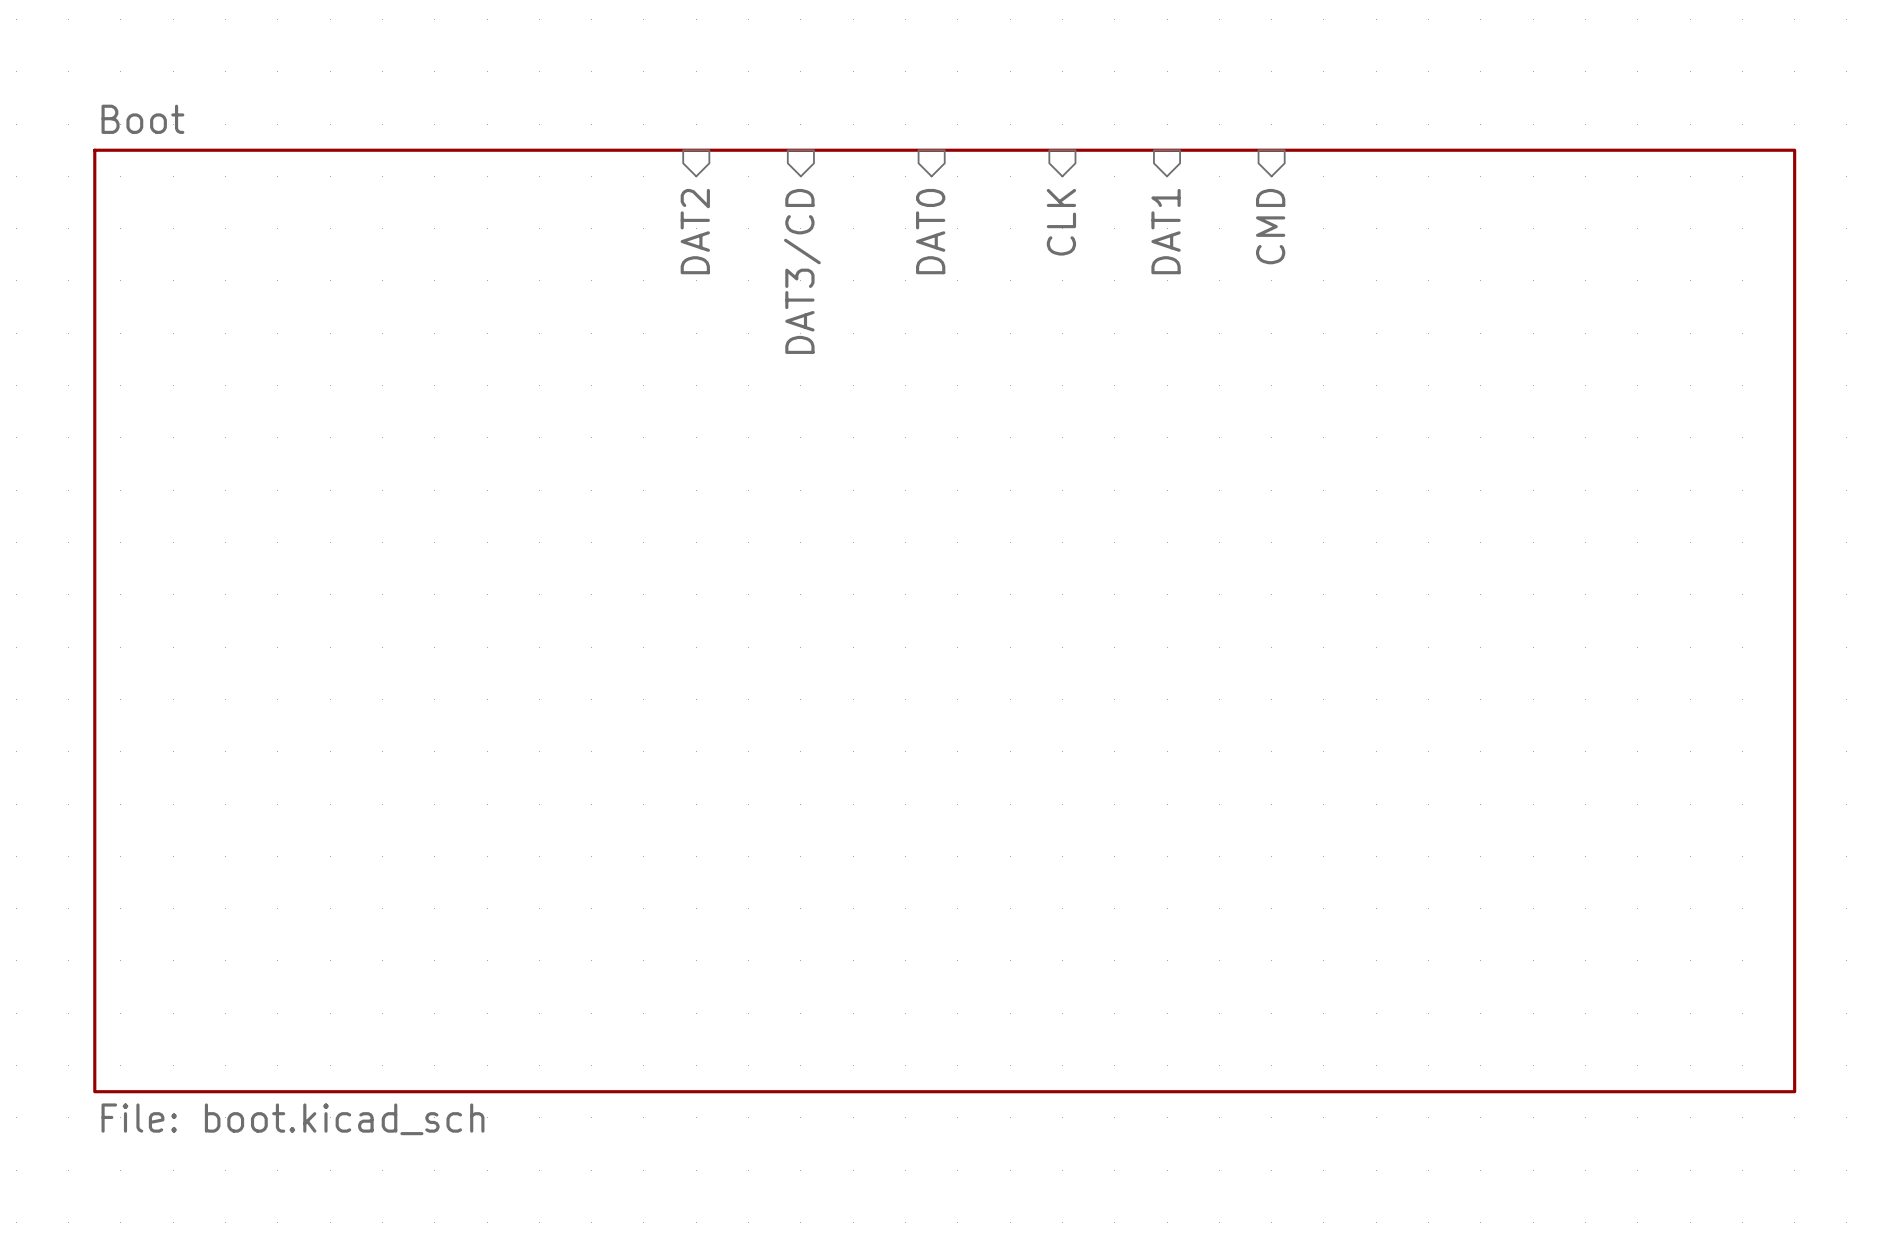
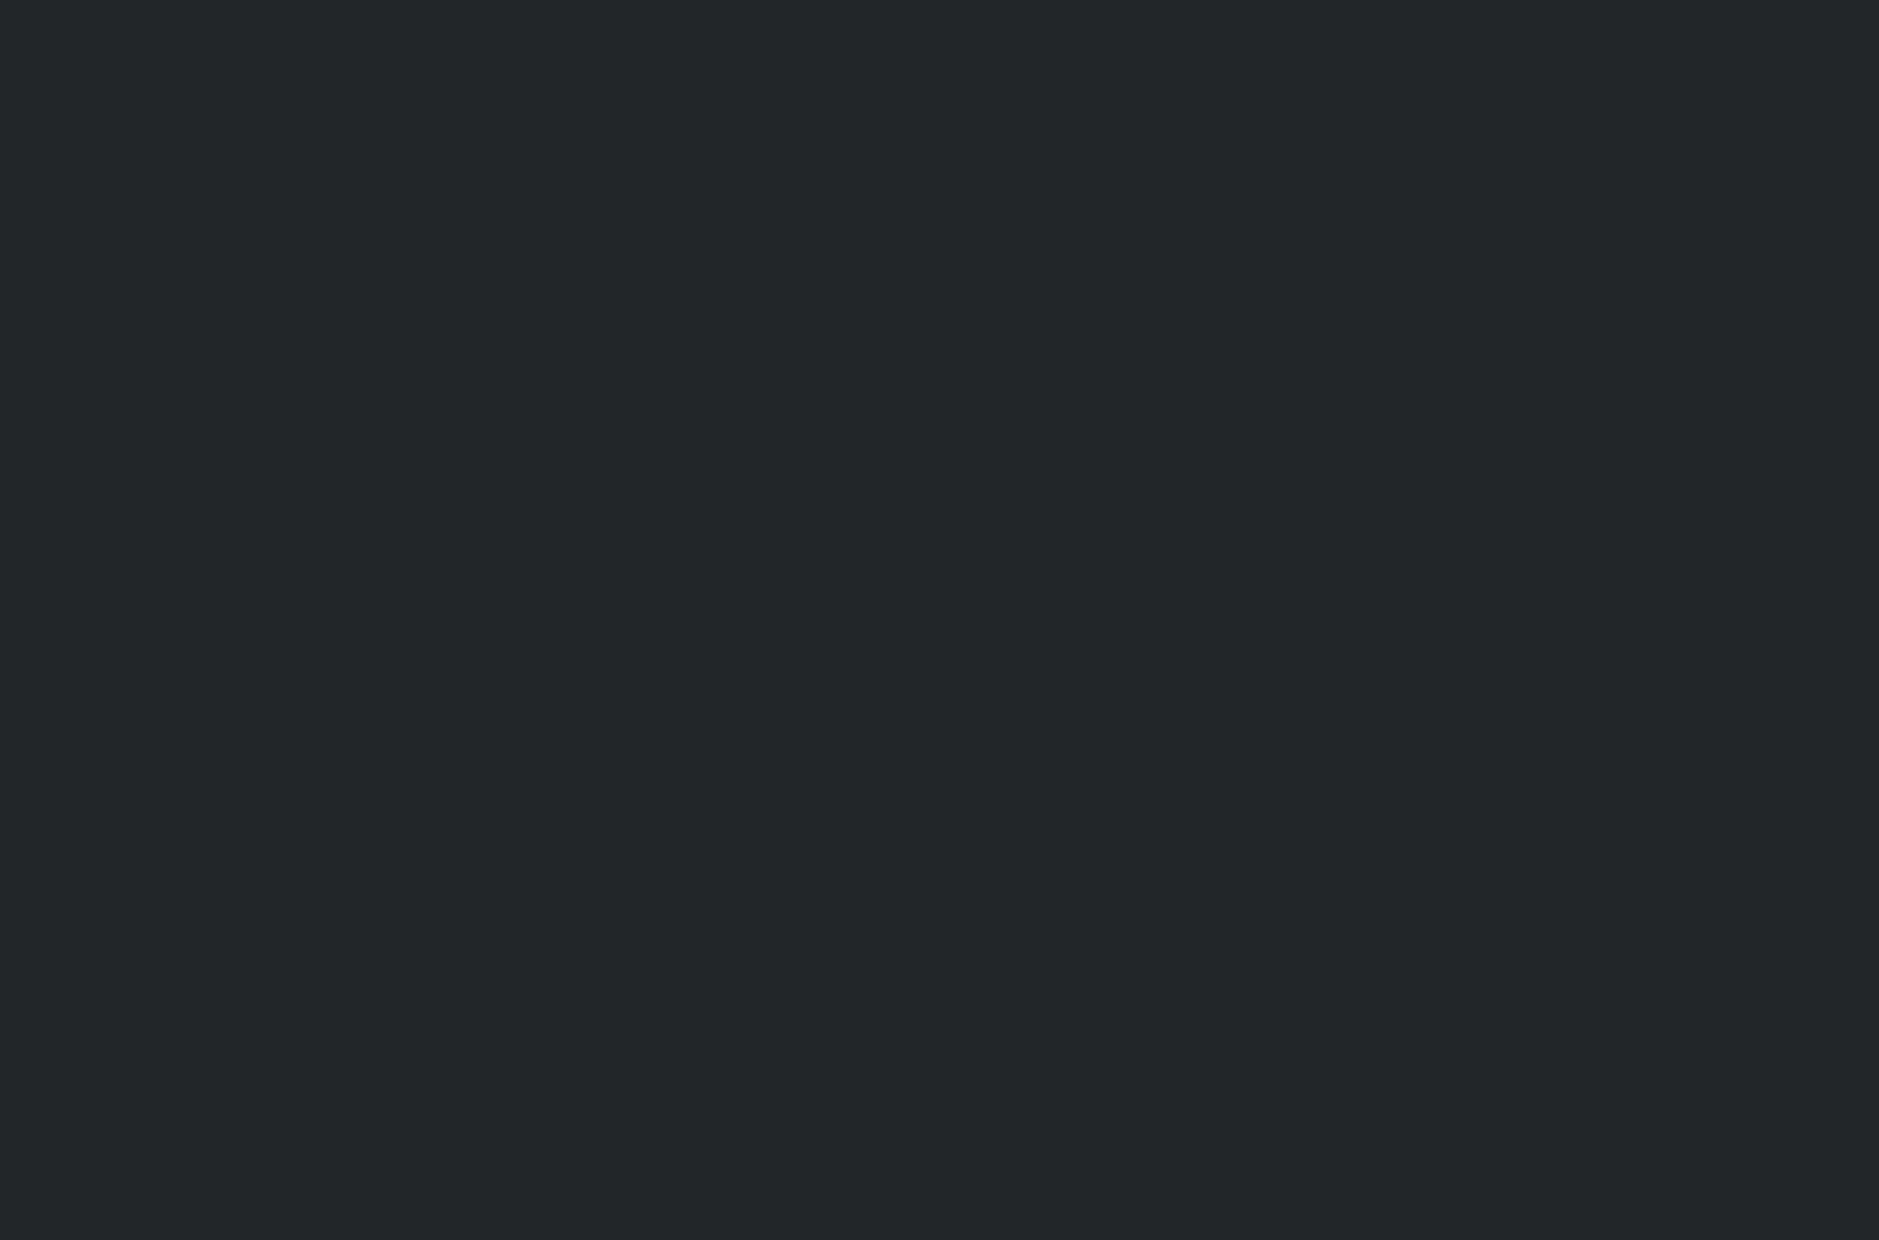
sheet pin: CLK (1061, 222) -> none
sheet pin: CMD (1270, 226) -> none
sheet pin: DAT2 (695, 231) -> none
sheet pin: DAT0 (930, 231) -> none
sheet pin: DAT1 (1166, 231) -> none
sheet pin: DAT3/CD (802, 271) -> none
sheet Boot: File: boot.kicad_sch (944, 620) -> none

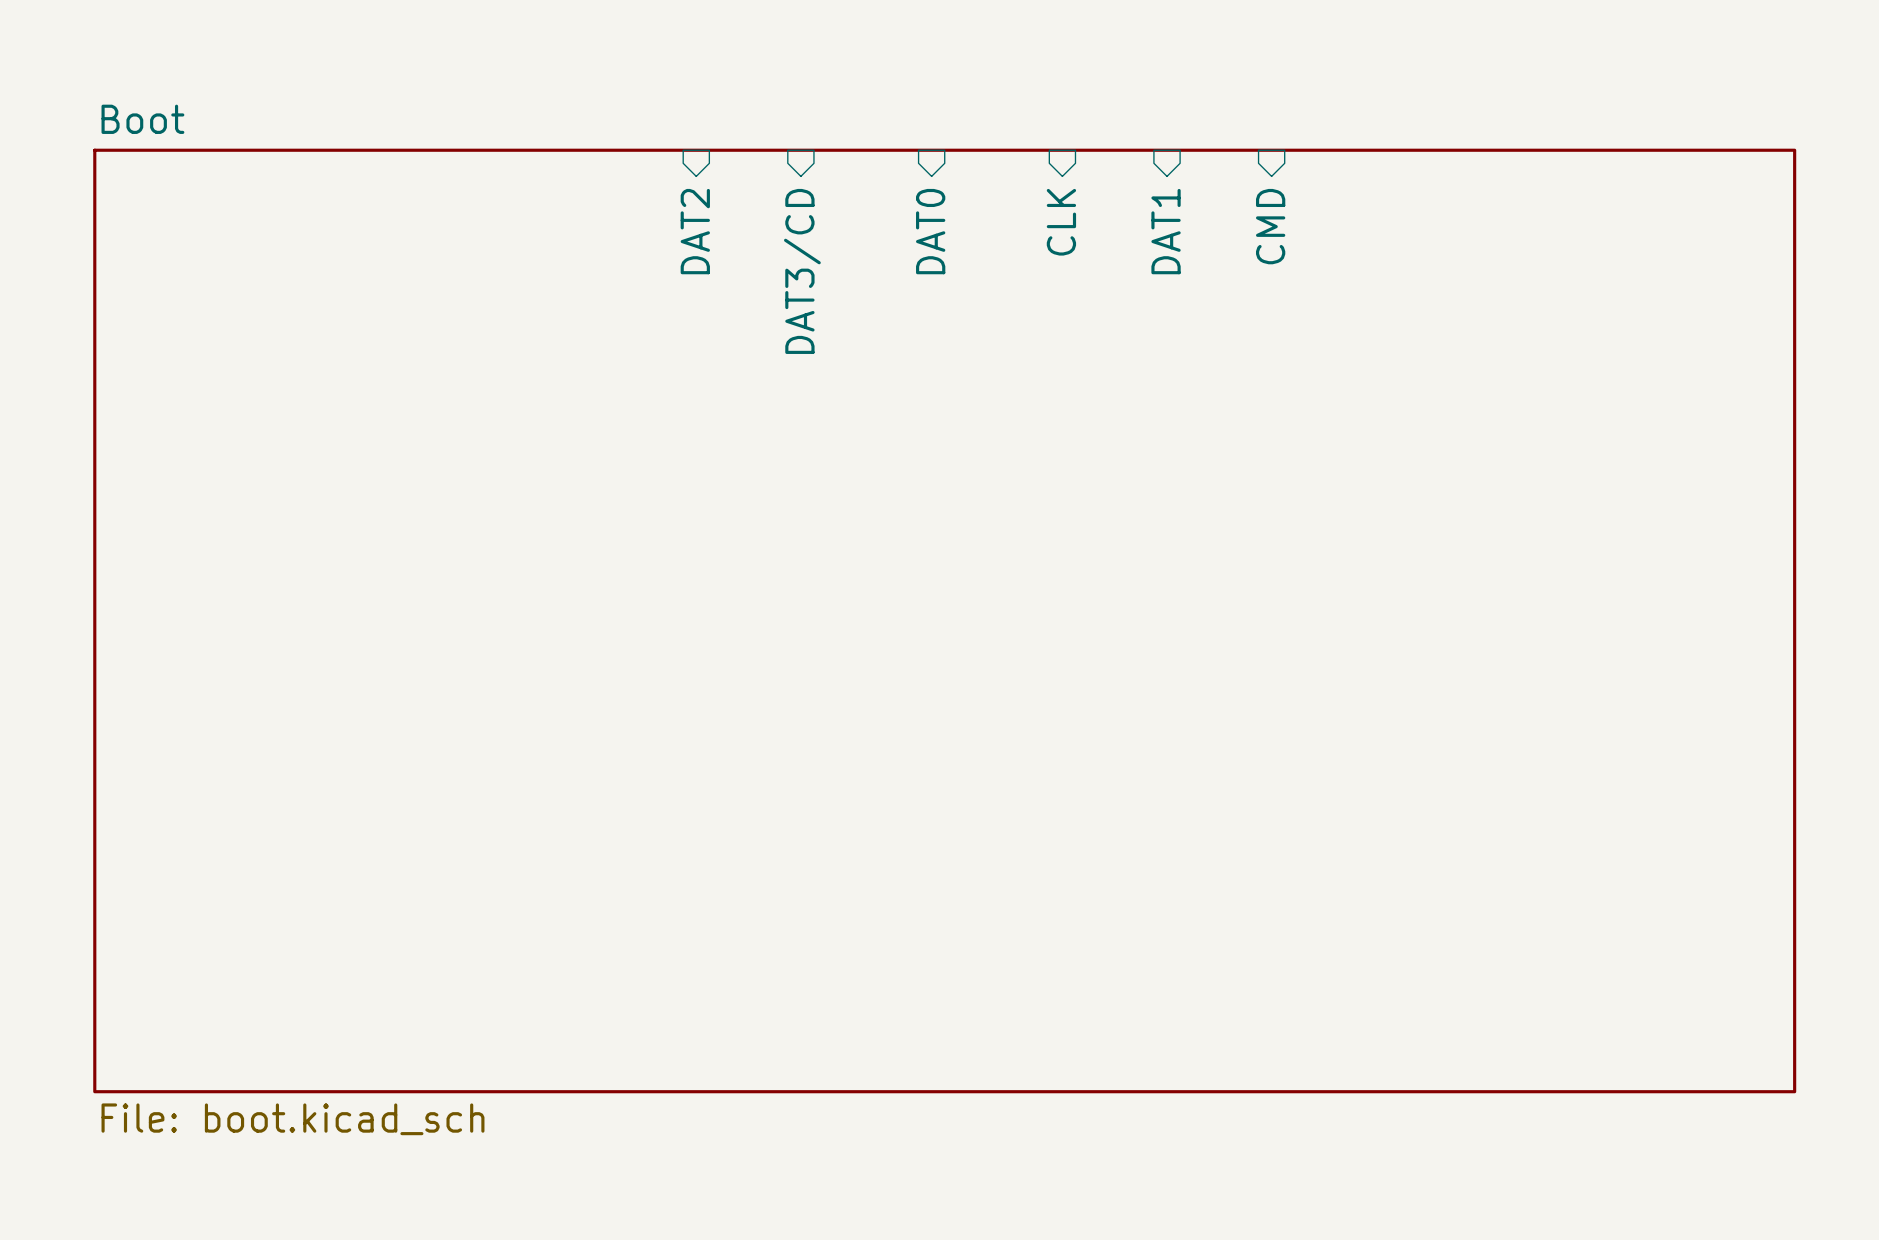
sheet pin: none -> CLK (1061, 222)
sheet pin: none -> CMD (1270, 226)
sheet pin: none -> DAT2 (695, 231)
sheet pin: none -> DAT0 (930, 231)
sheet pin: none -> DAT1 (1166, 231)
sheet pin: none -> DAT3/CD (802, 271)
sheet Boot: none -> File: boot.kicad_sch (944, 620)

